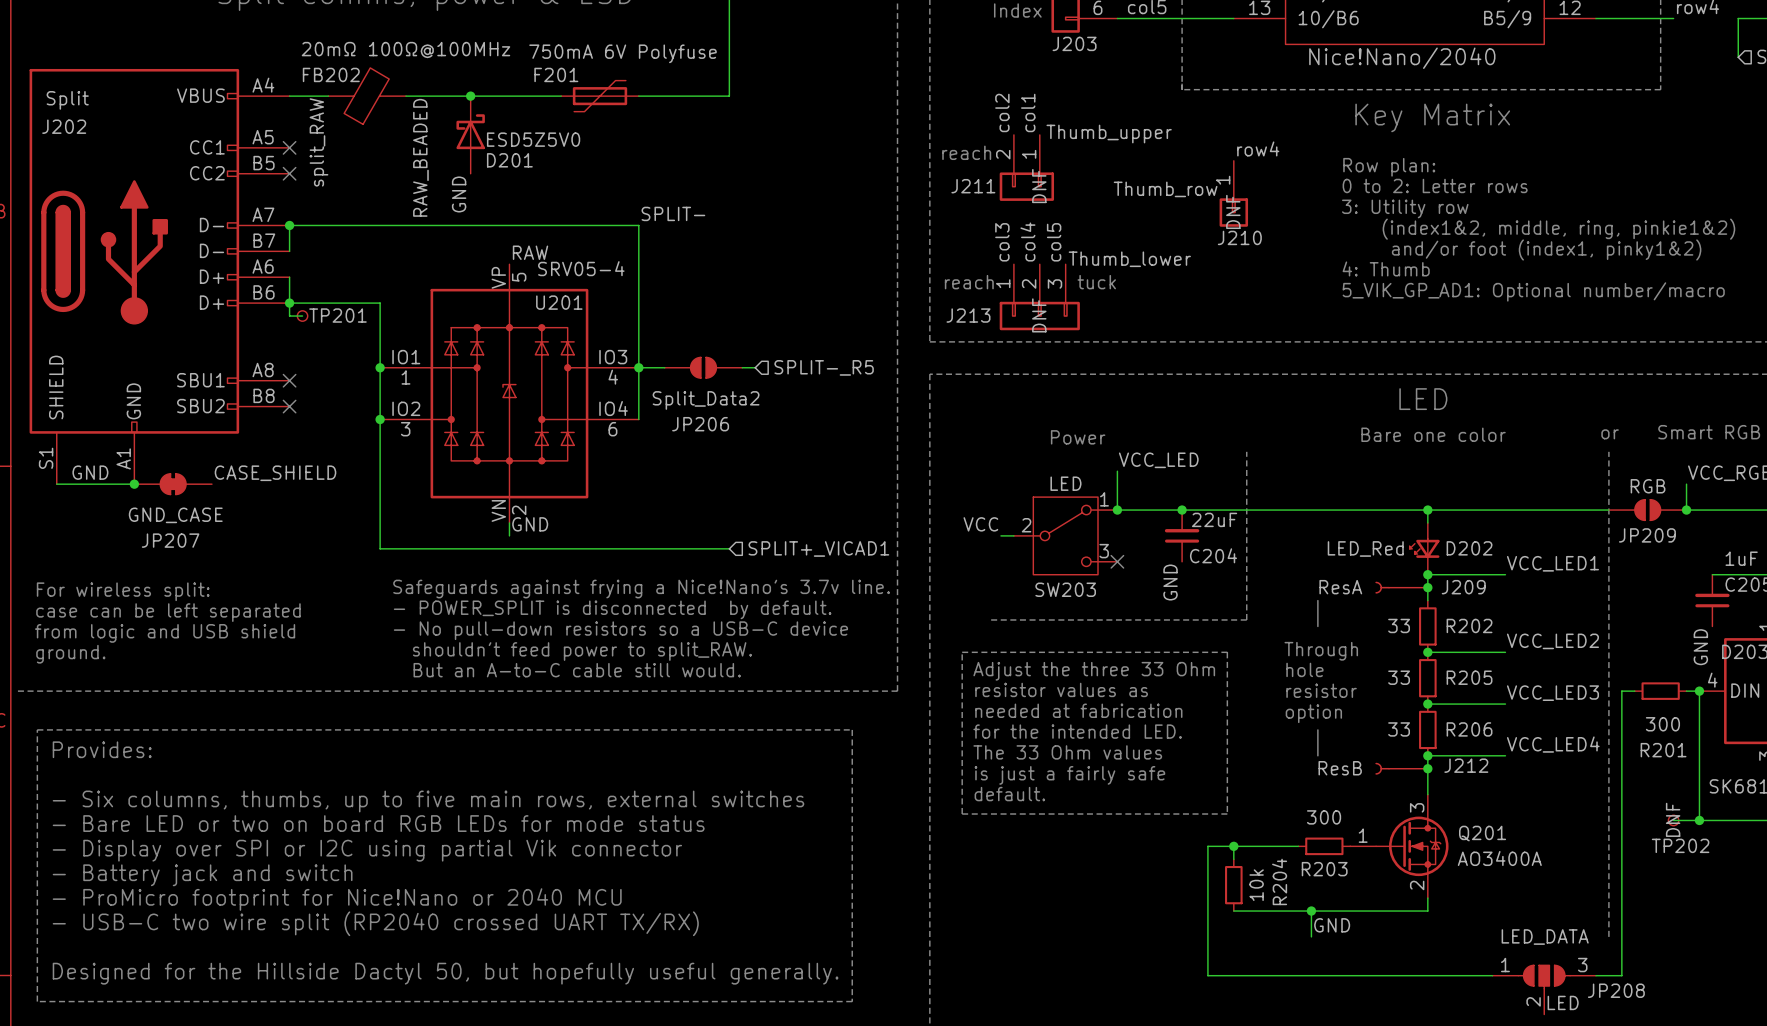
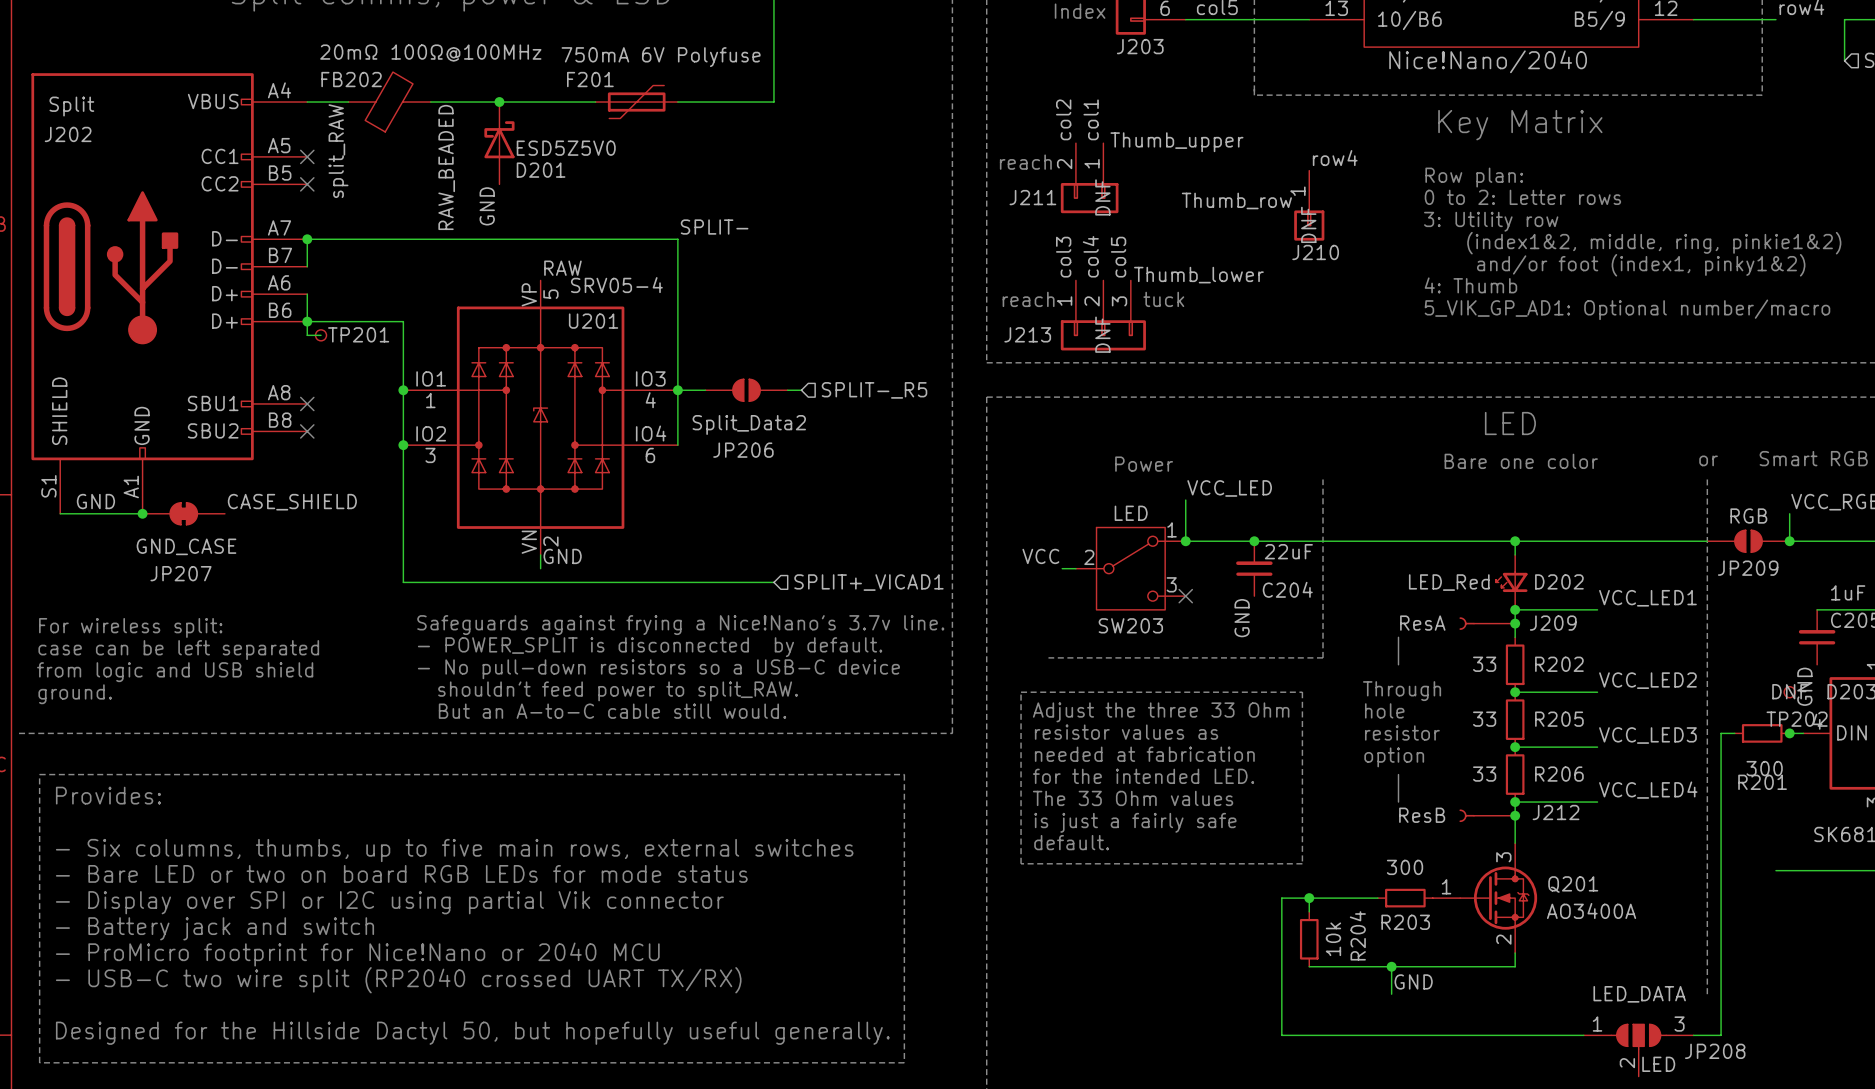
wire: (1699, 691) (1699, 820) -> none
junction position: (1699, 691) -> (1789, 733)
R201 name position: R201 (1663, 750) -> R201 (1762, 782)
TP202 text rotation: 0° (1673, 819) -> 90° clockwise (1790, 691)
TP202 position: (1673, 820) -> (1789, 692)
junction: (1699, 820) -> none

